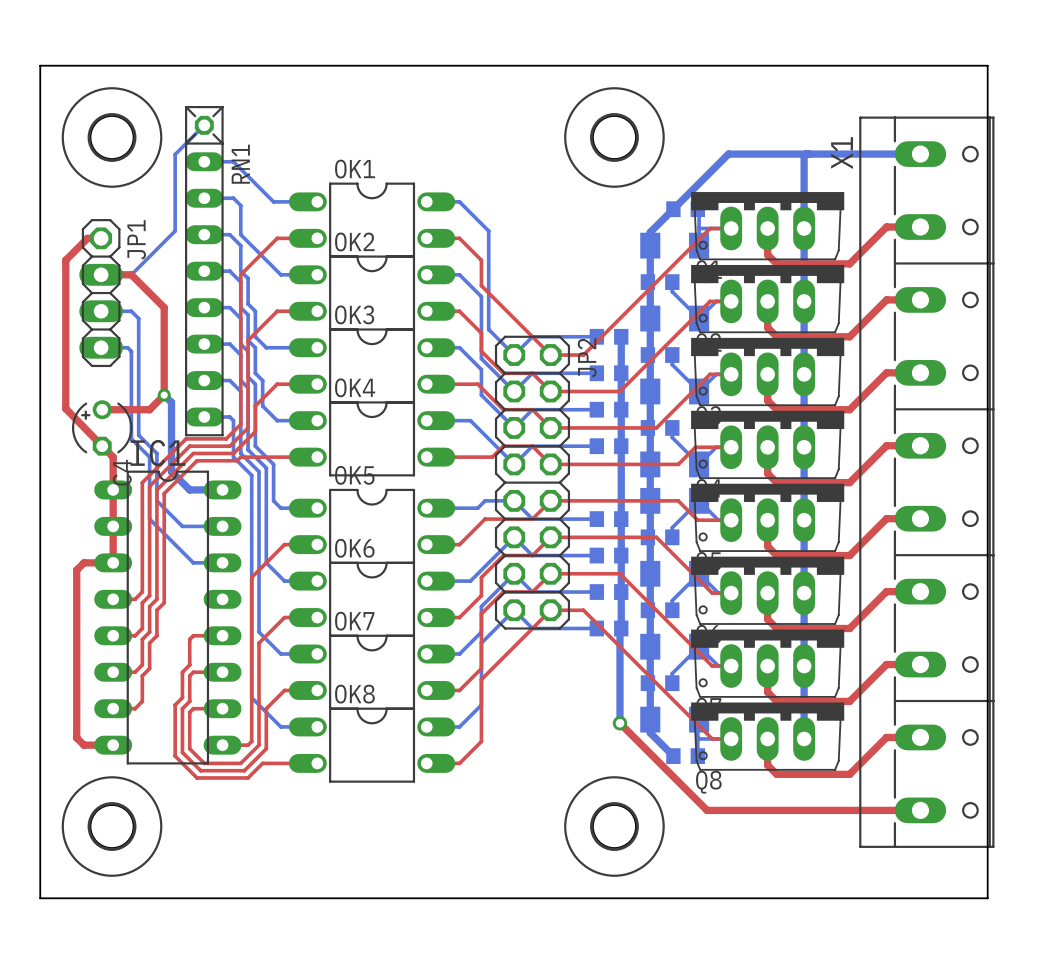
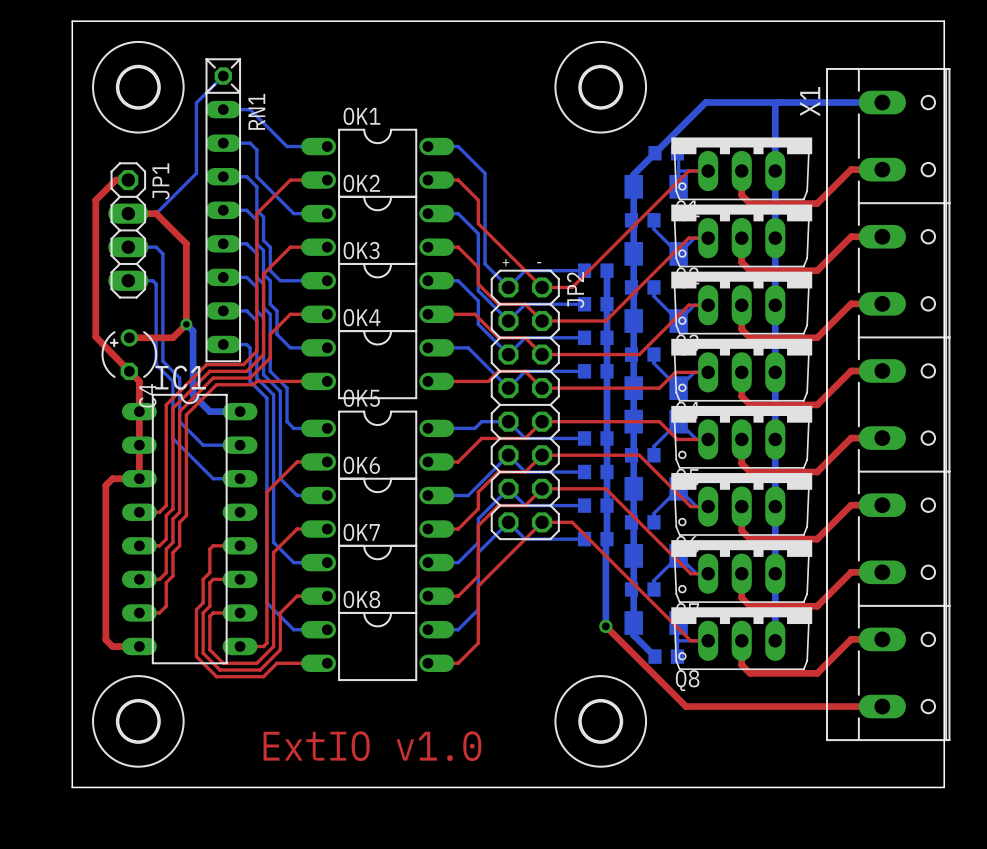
text: none -> + - (521, 262)
text: none -> ExtIO v1.0 (372, 746)

